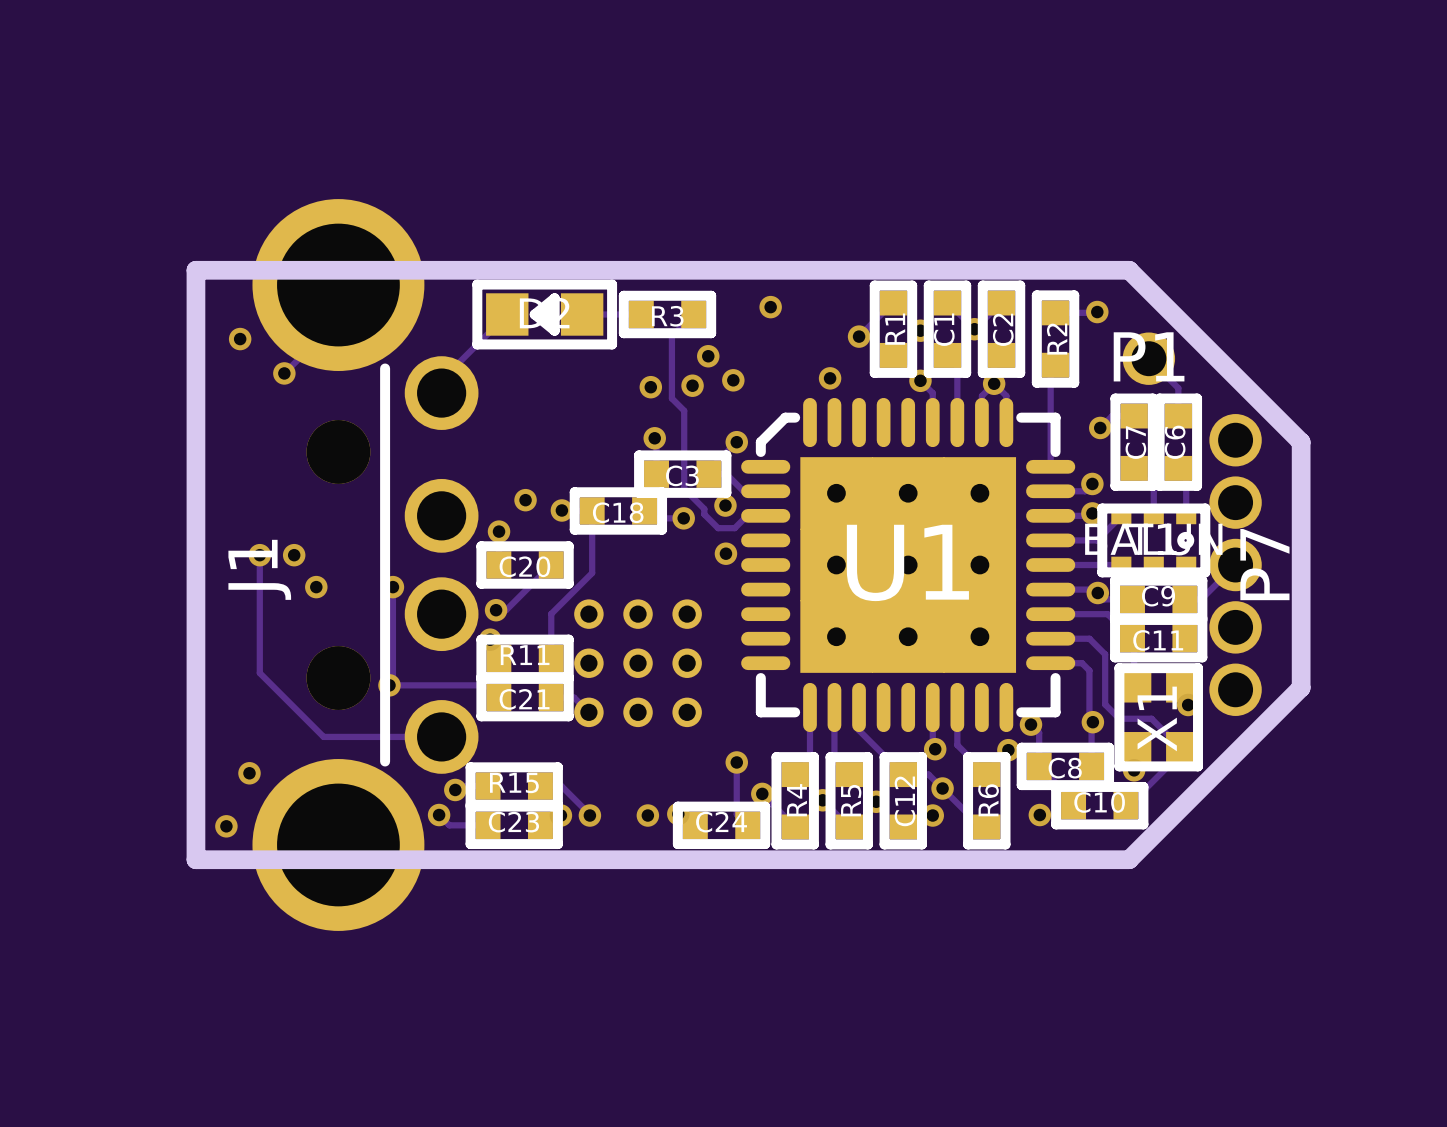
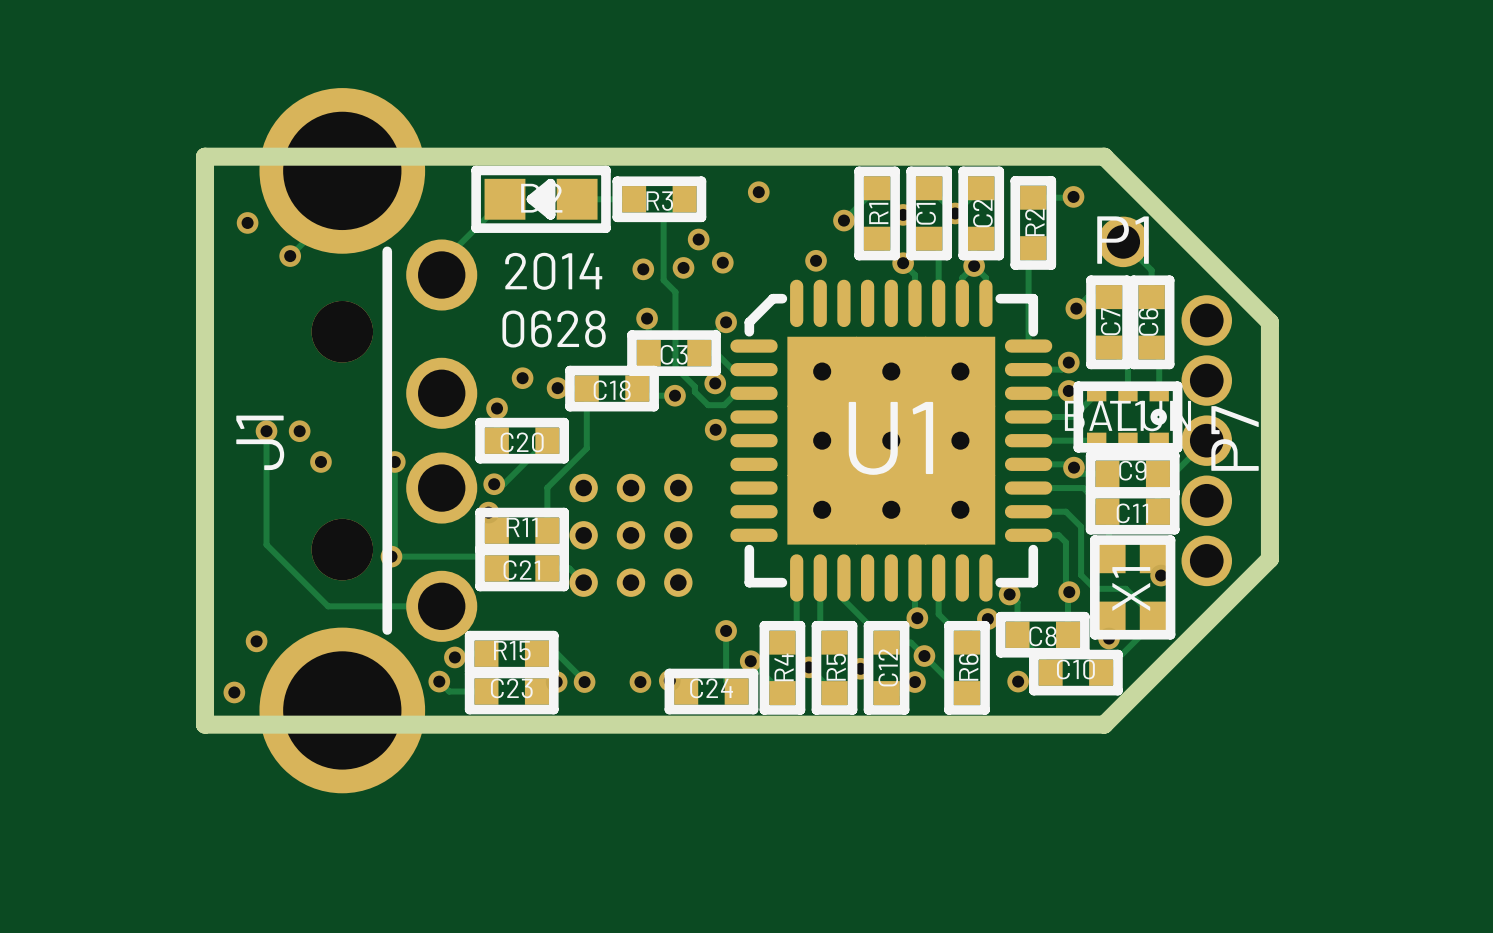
text: none -> 2014 (553, 271)
text: none -> 0628 (554, 329)

